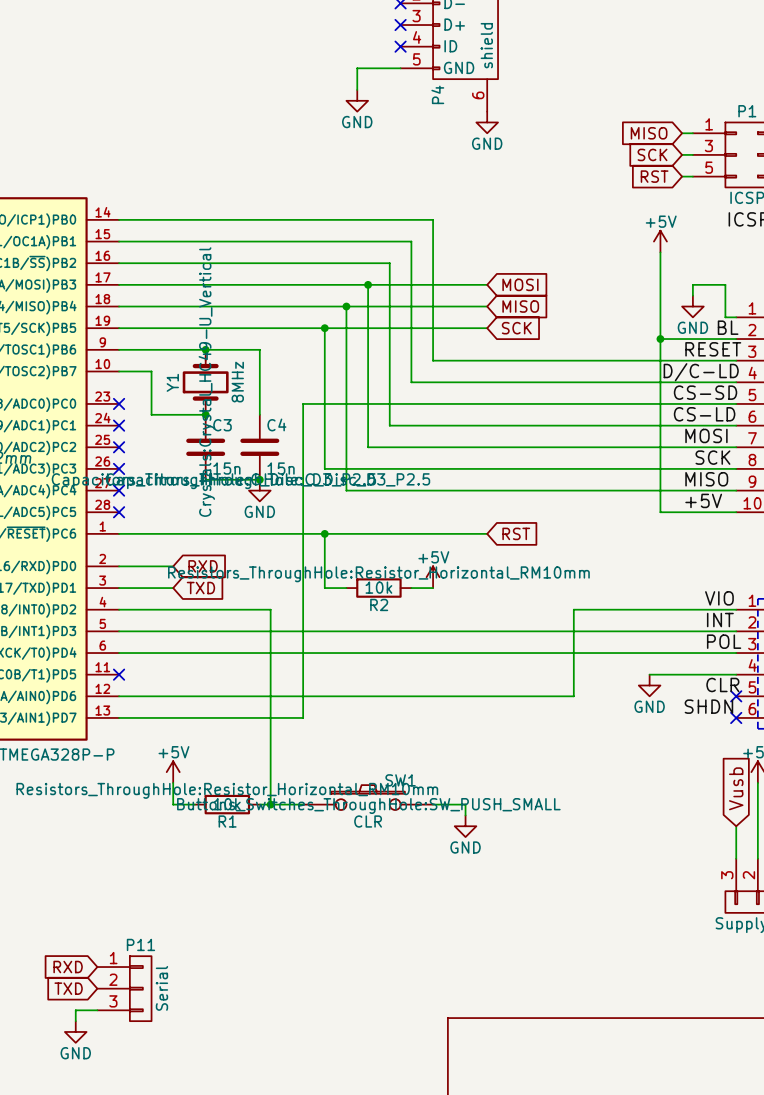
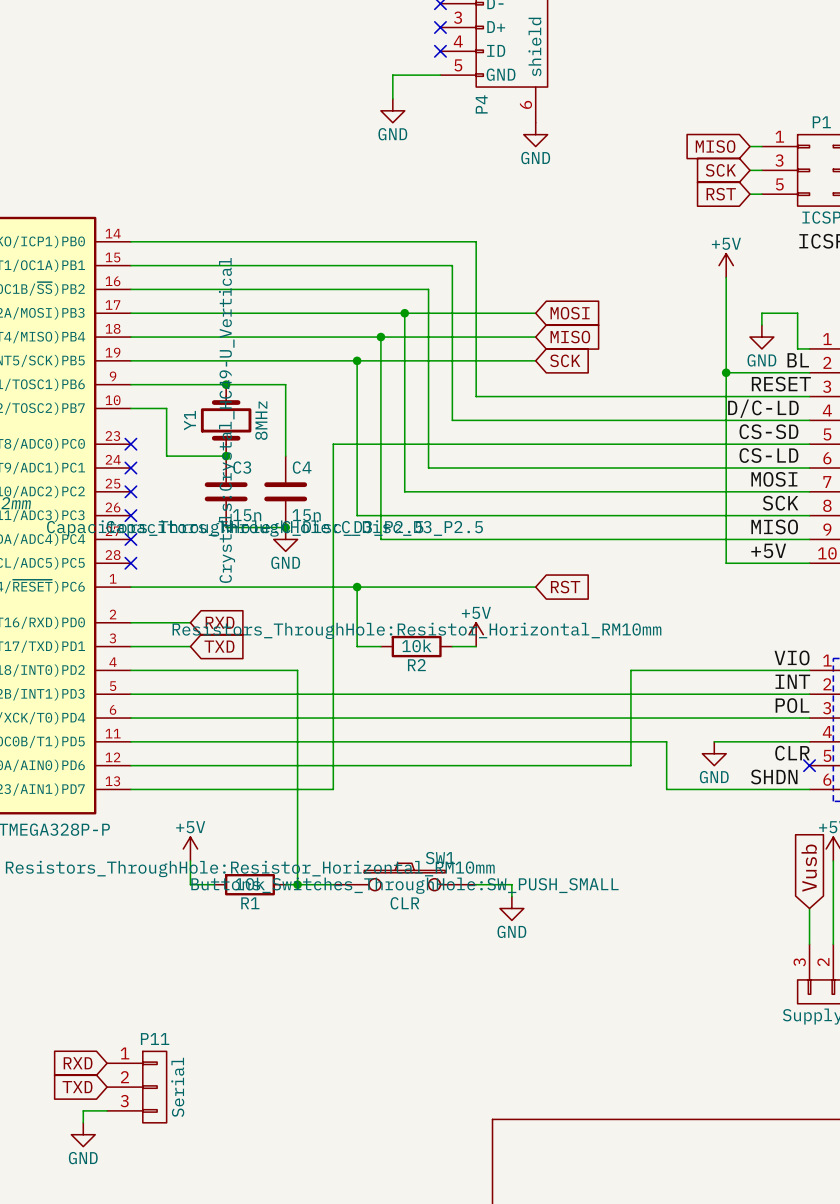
wire: none -> (130, 741) (666, 741) (666, 789) (809, 789)
no-connect mark: (119, 674) -> none
no-connect mark: (736, 717) -> none

